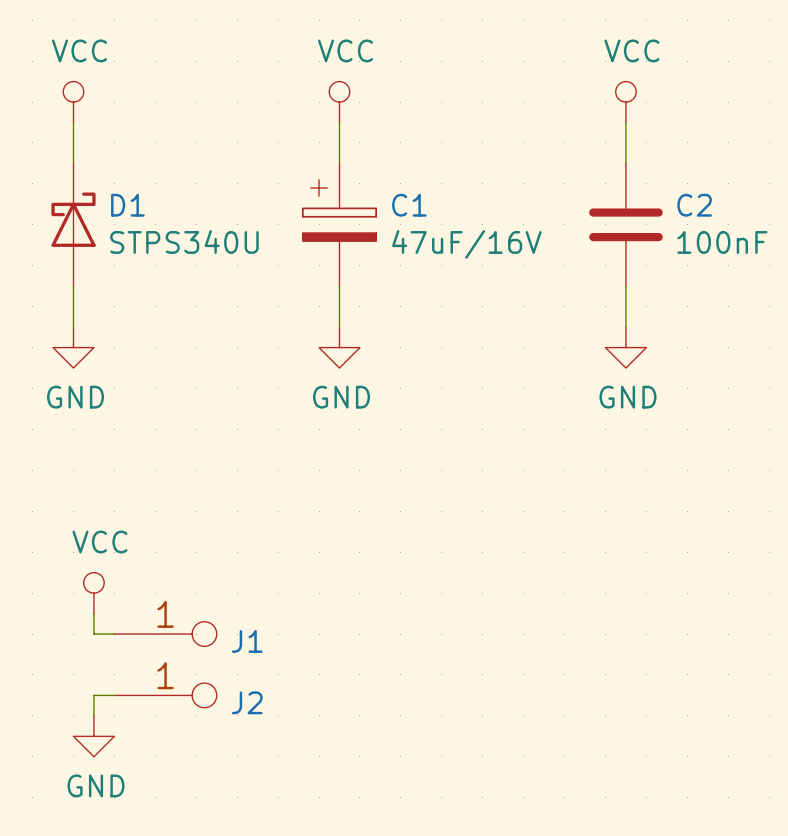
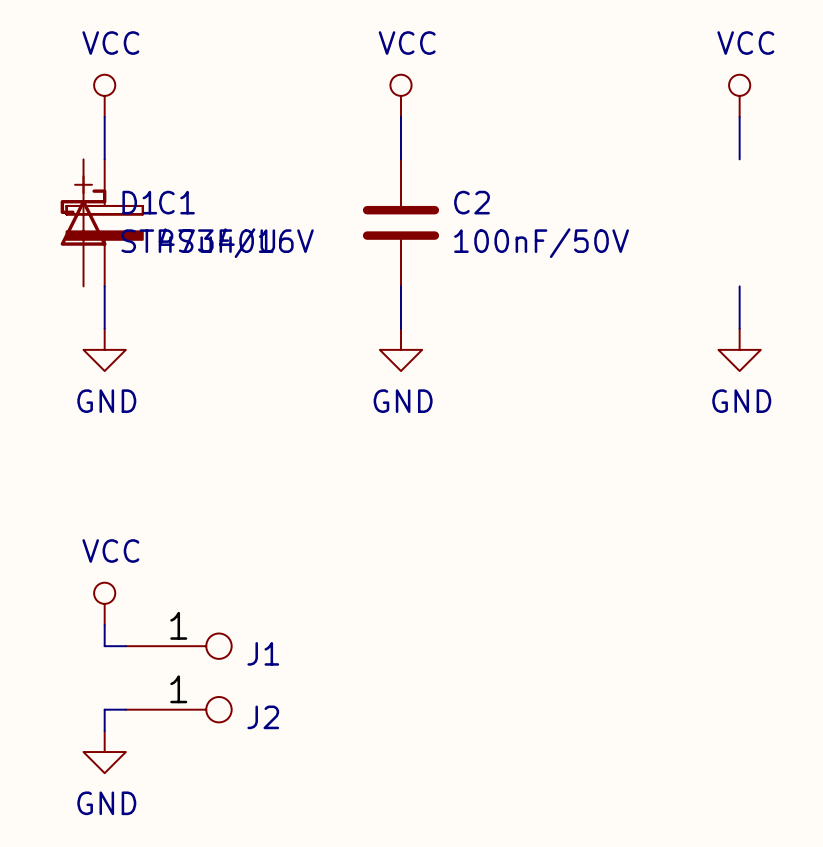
power symbol position: VCC (73, 102) -> VCC (104, 95)
power symbol position: VCC (339, 102) -> VCC (400, 95)
power symbol position: VCC (625, 102) -> VCC (739, 95)
wire: (73, 122) (73, 163) -> none
wire: (339, 122) (339, 163) -> (104, 117) (104, 159)
wire: (625, 122) (625, 163) -> (400, 117) (400, 159)
wire: none -> (739, 117) (739, 159)
C1 position: (339, 224) -> (104, 222)
C2 position: (625, 224) -> (400, 222)
C2 value: 100nF (722, 242) -> 100nF/50V (541, 243)
wire: (73, 286) (73, 327) -> none
wire: (339, 286) (339, 327) -> (104, 286) (104, 328)
wire: (625, 286) (625, 327) -> (400, 286) (400, 328)
wire: none -> (739, 286) (739, 328)
power symbol position: GND (73, 347) -> GND (104, 349)
power symbol position: GND (339, 347) -> GND (400, 349)
power symbol position: GND (625, 347) -> GND (739, 349)

